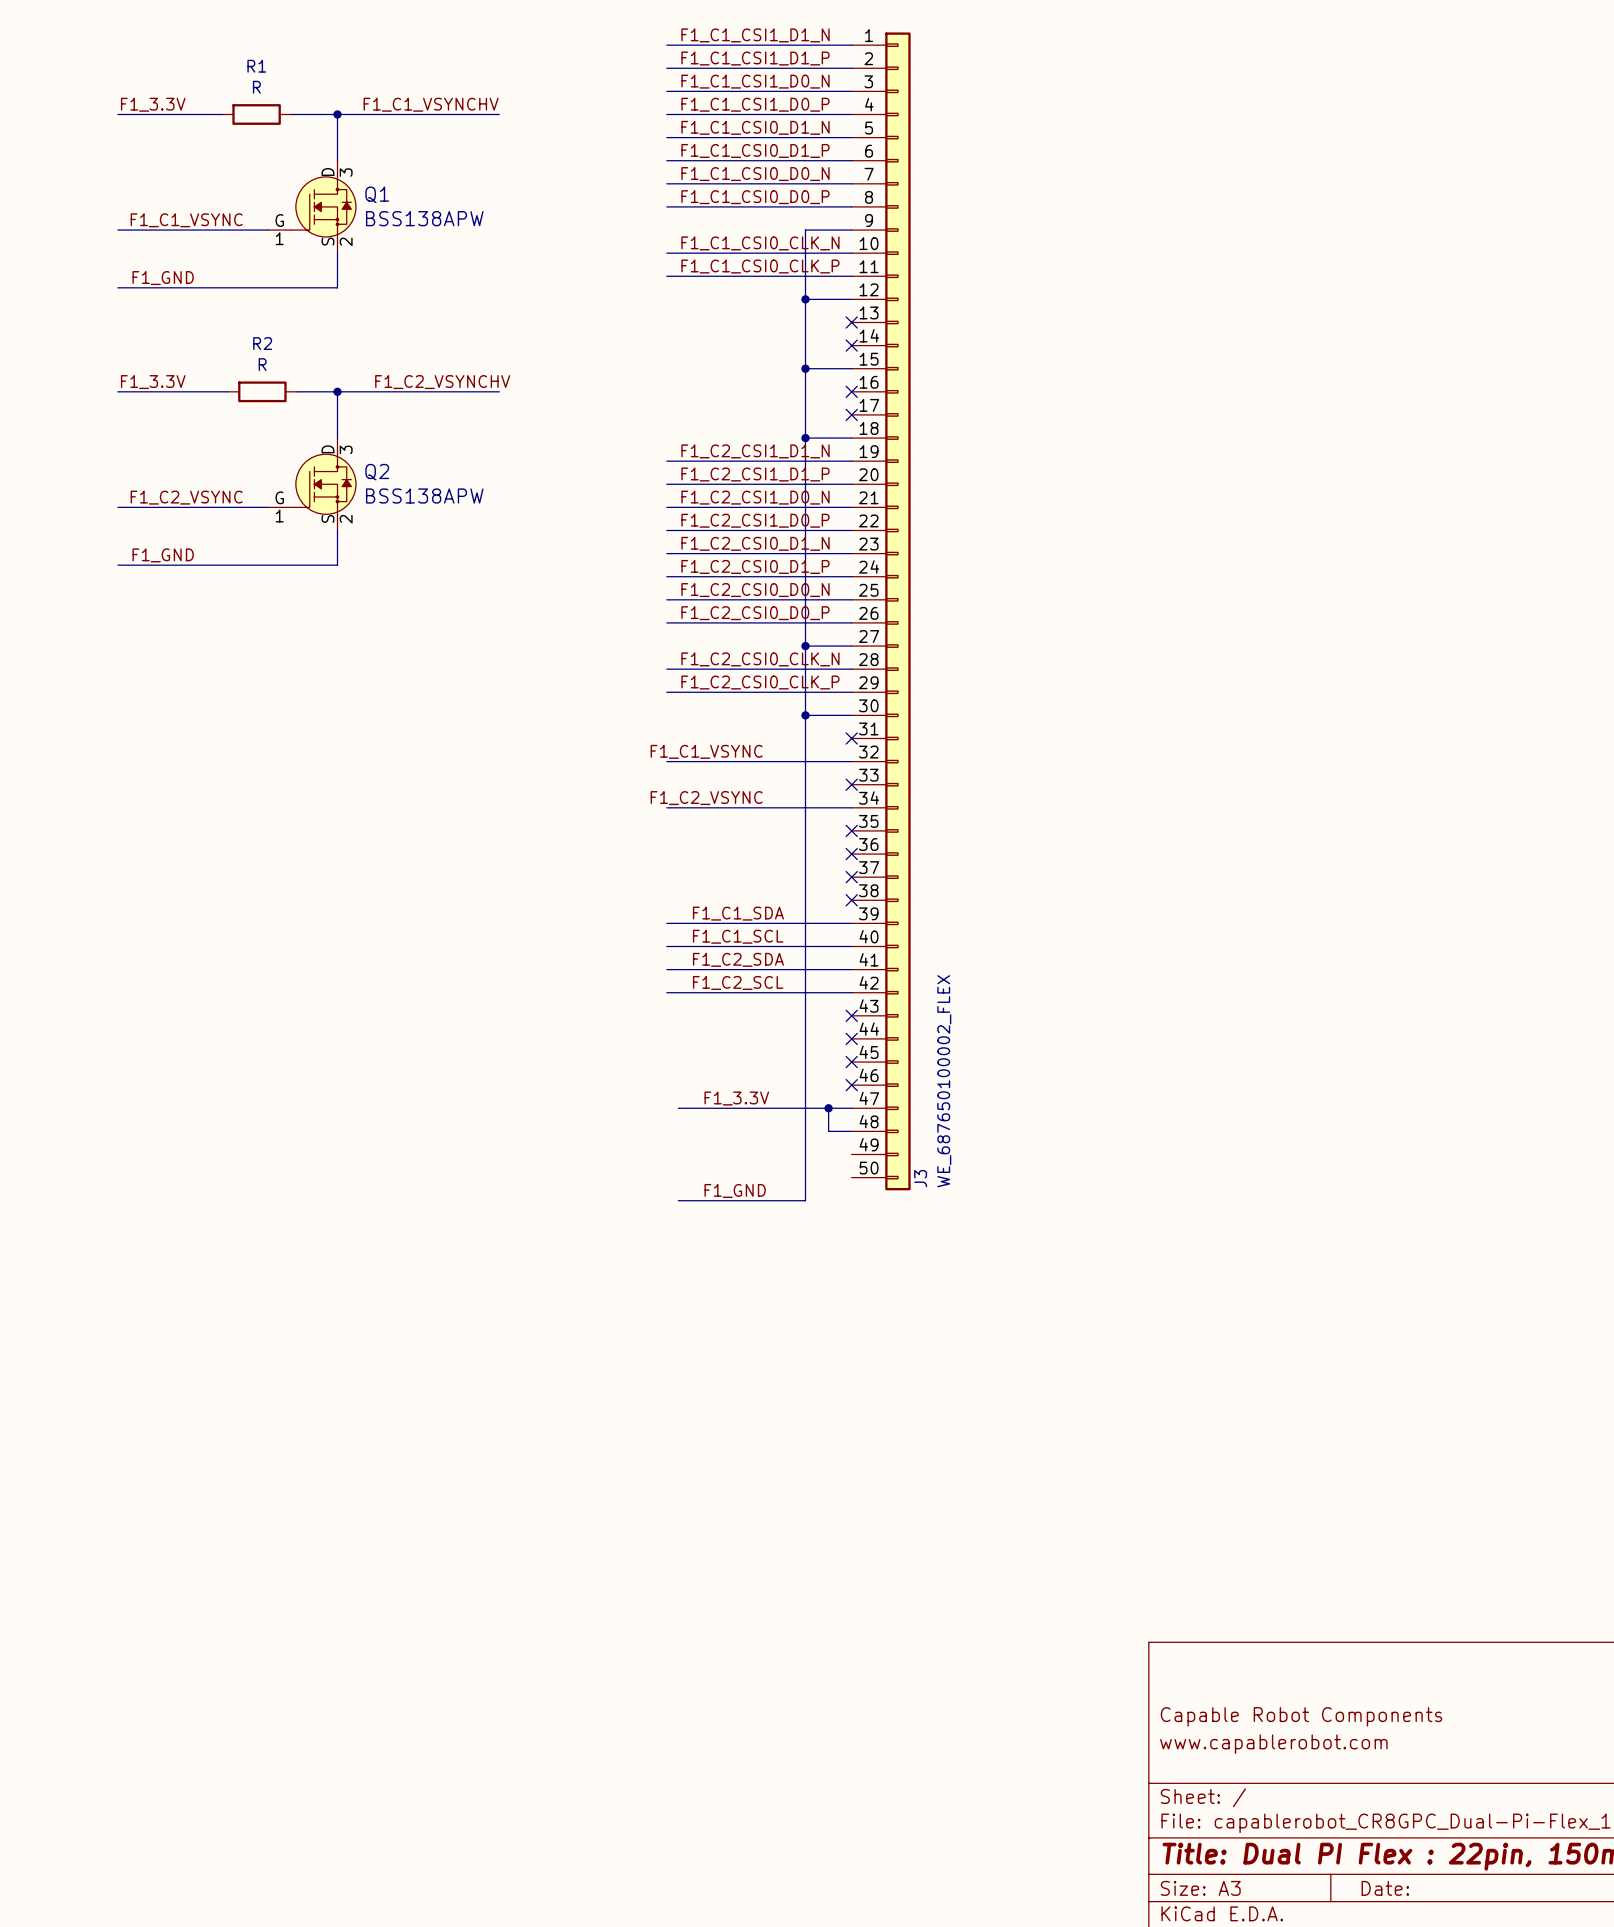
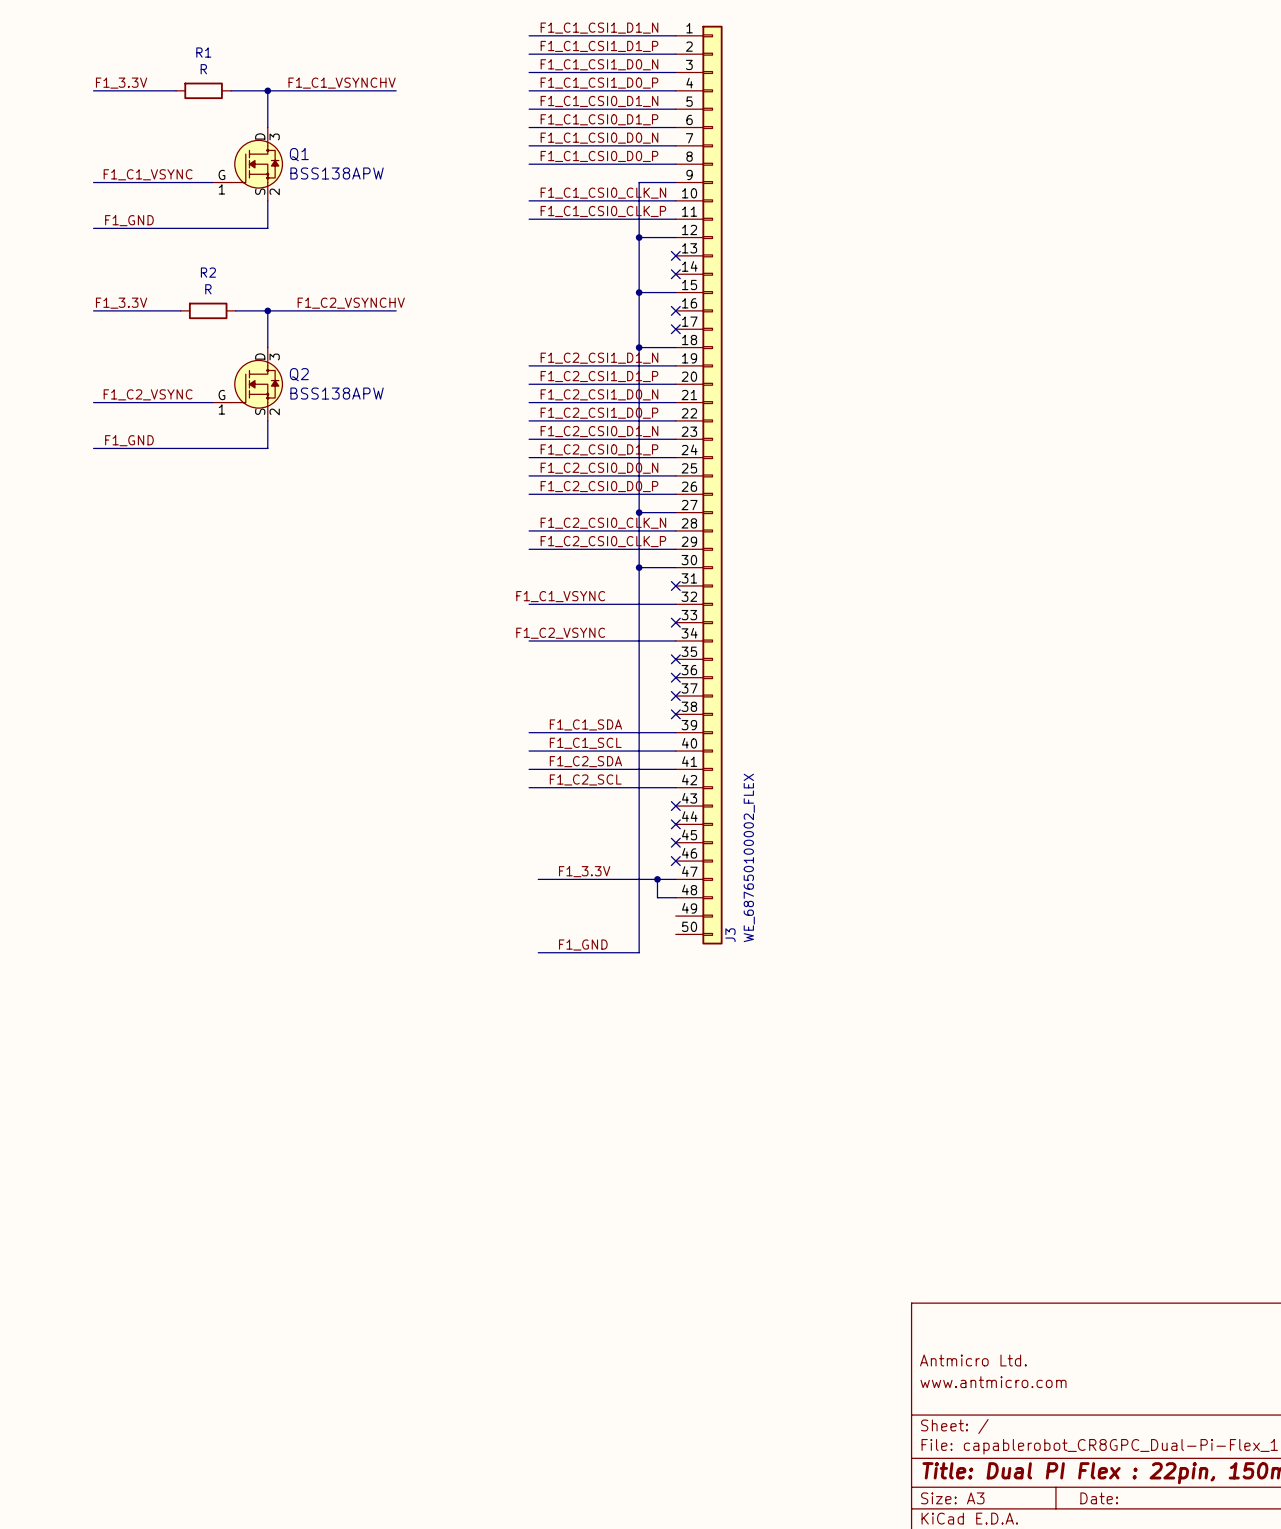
title block: Capable Robot Components (1301, 1716) -> Antmicro Ltd. (973, 1360)
title block: www.capablerobot.com (1273, 1744) -> www.antmicro.com (993, 1382)

